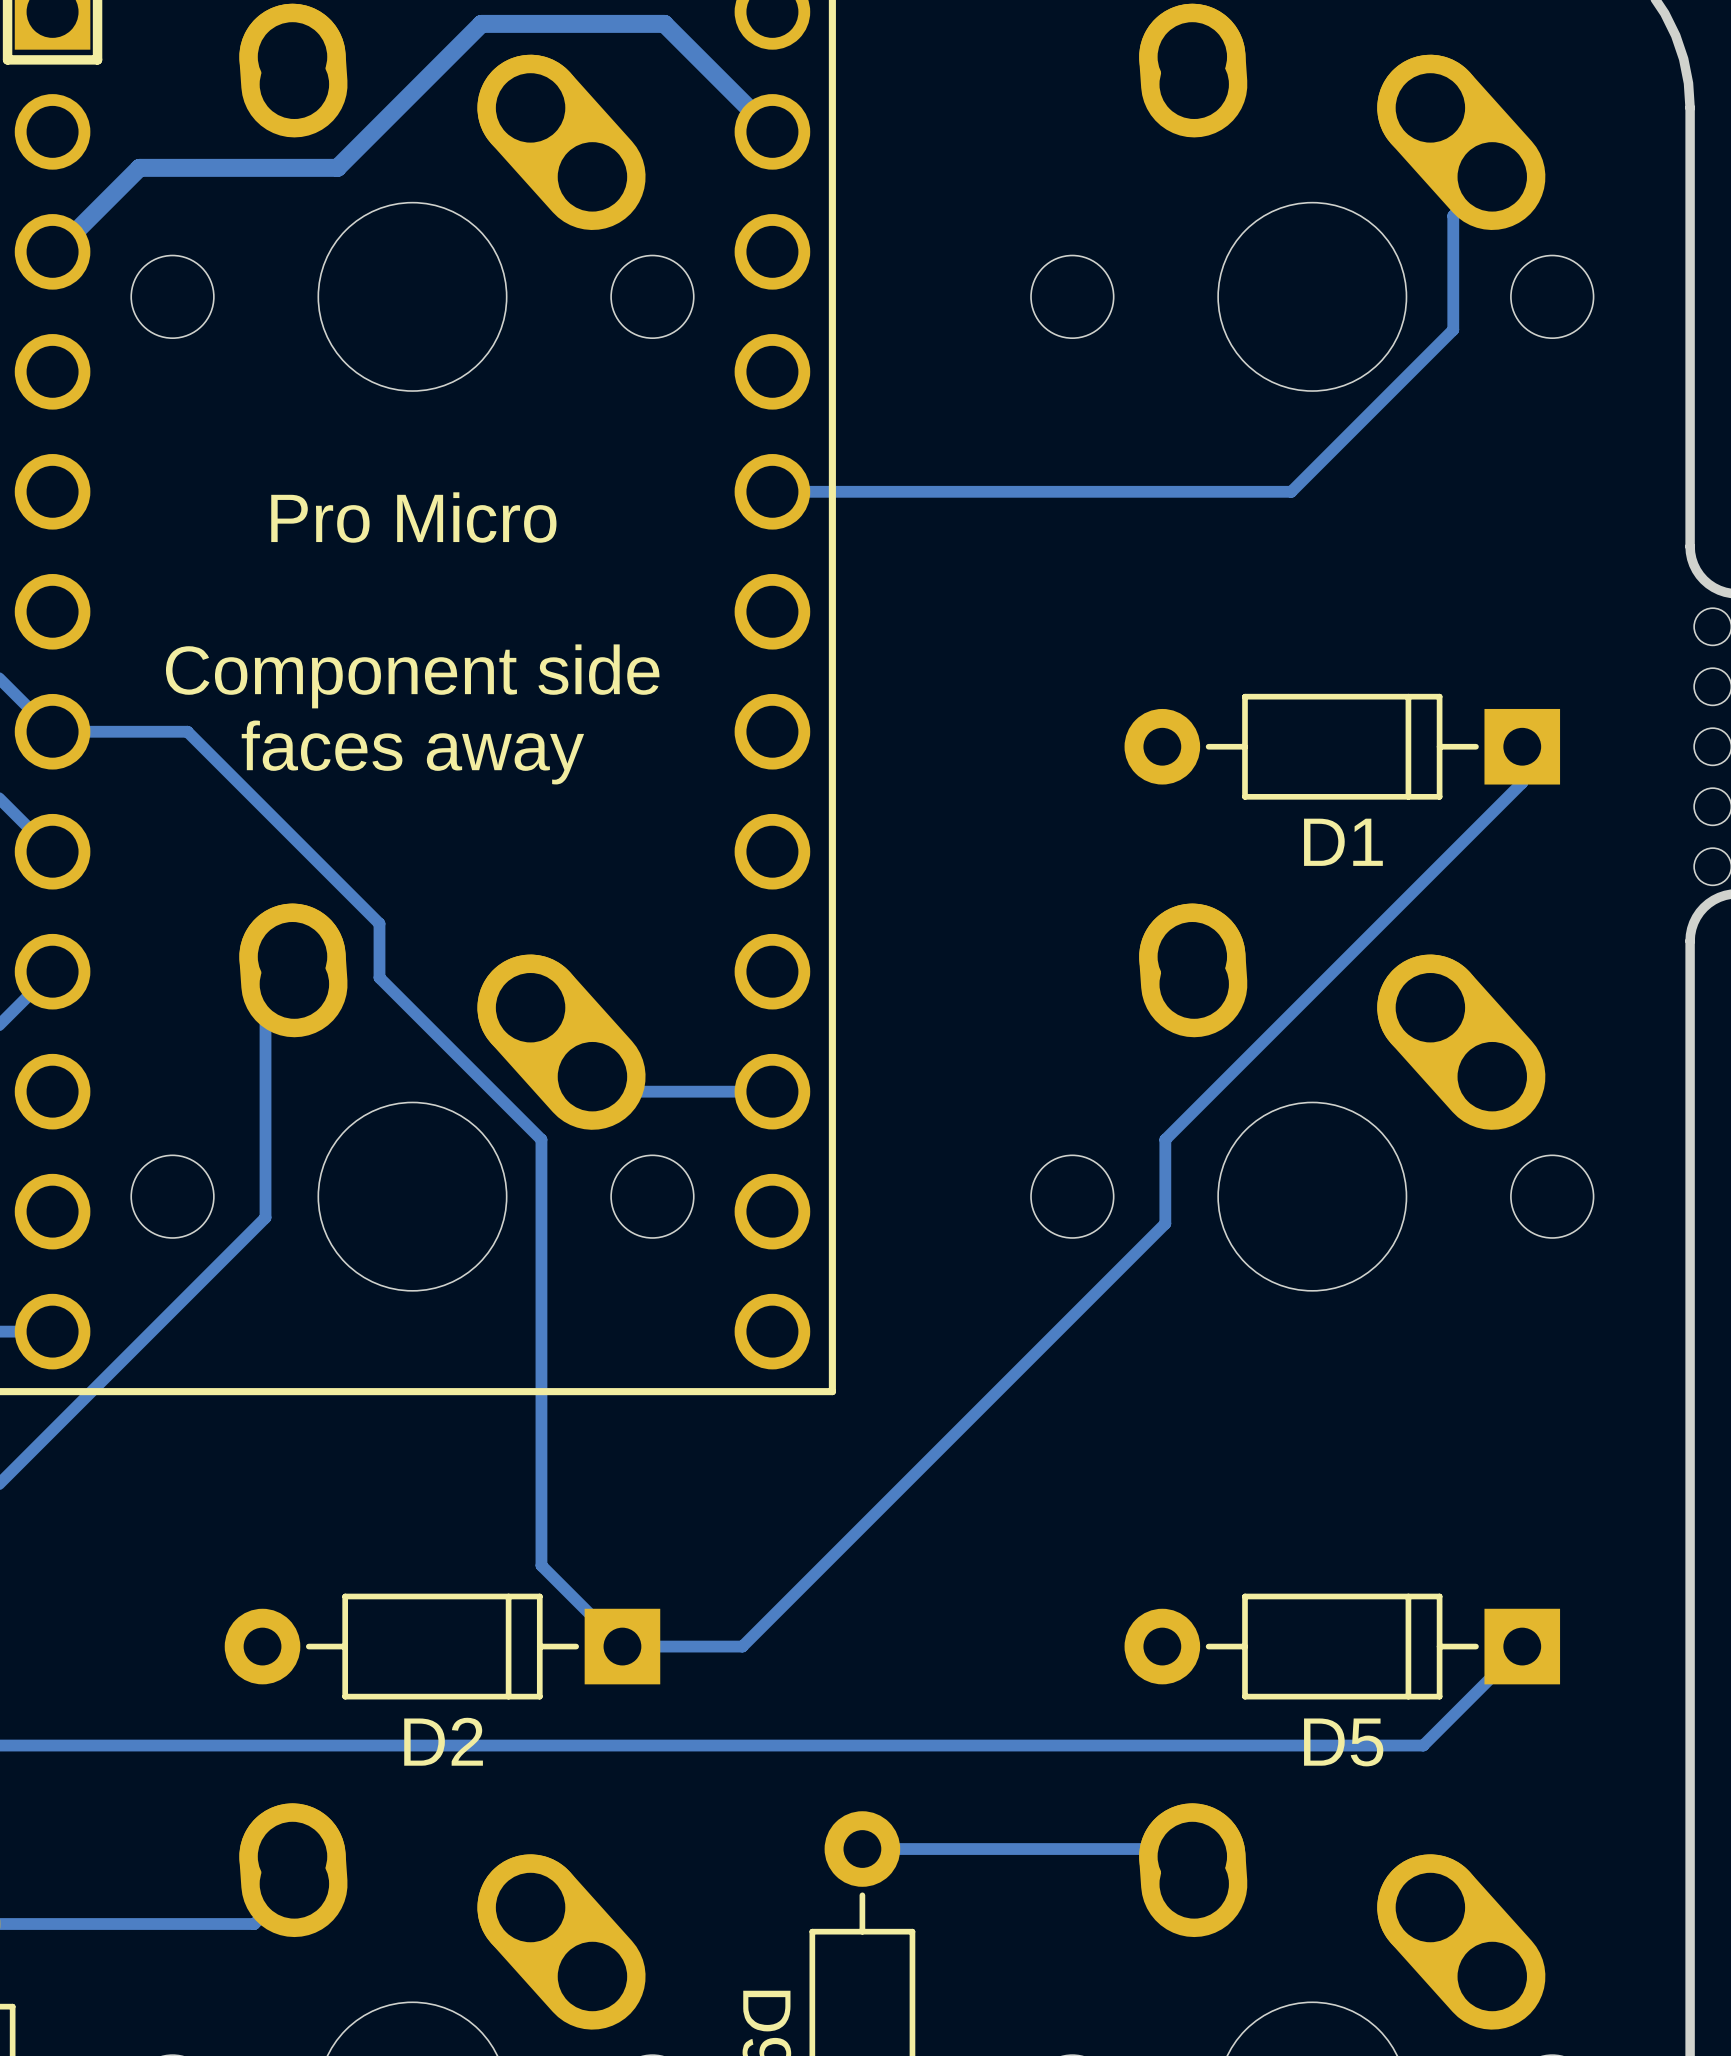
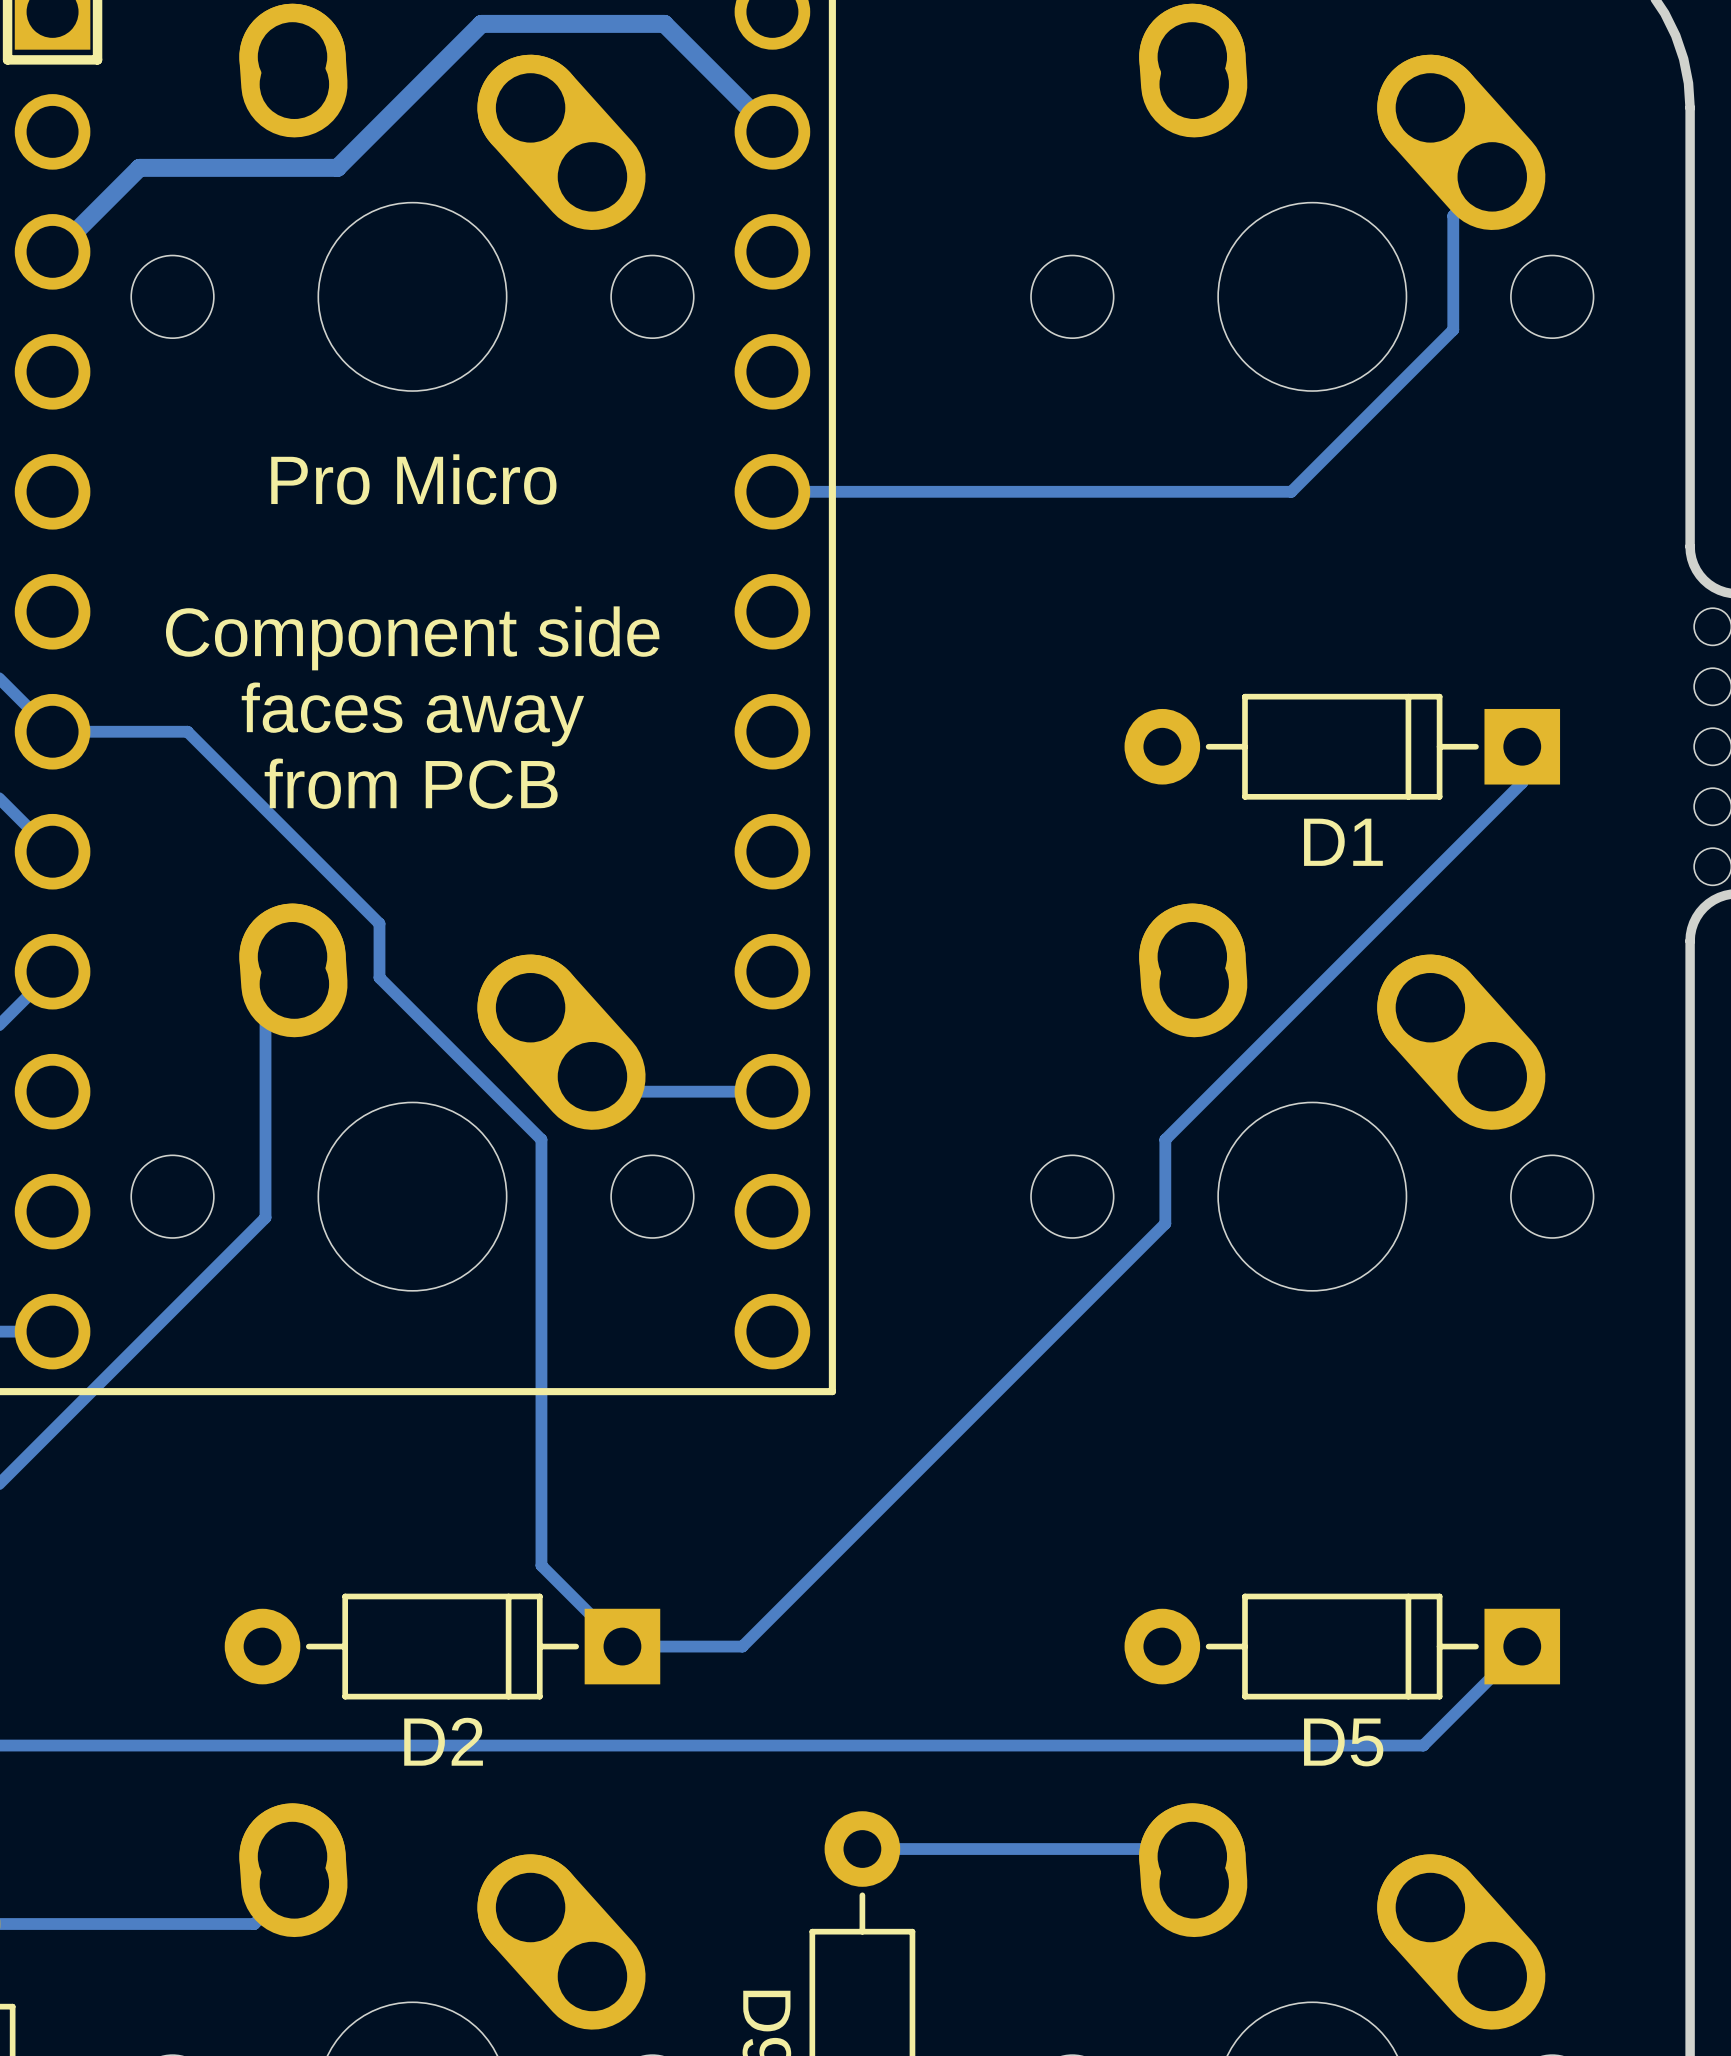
text position: Pro Micro (413, 517) -> Pro Micro (413, 479)
text position: Component side (412, 676) -> Component side (412, 638)
text position: faces away (412, 752) -> faces away (412, 714)
text: none -> from PCB (411, 783)

